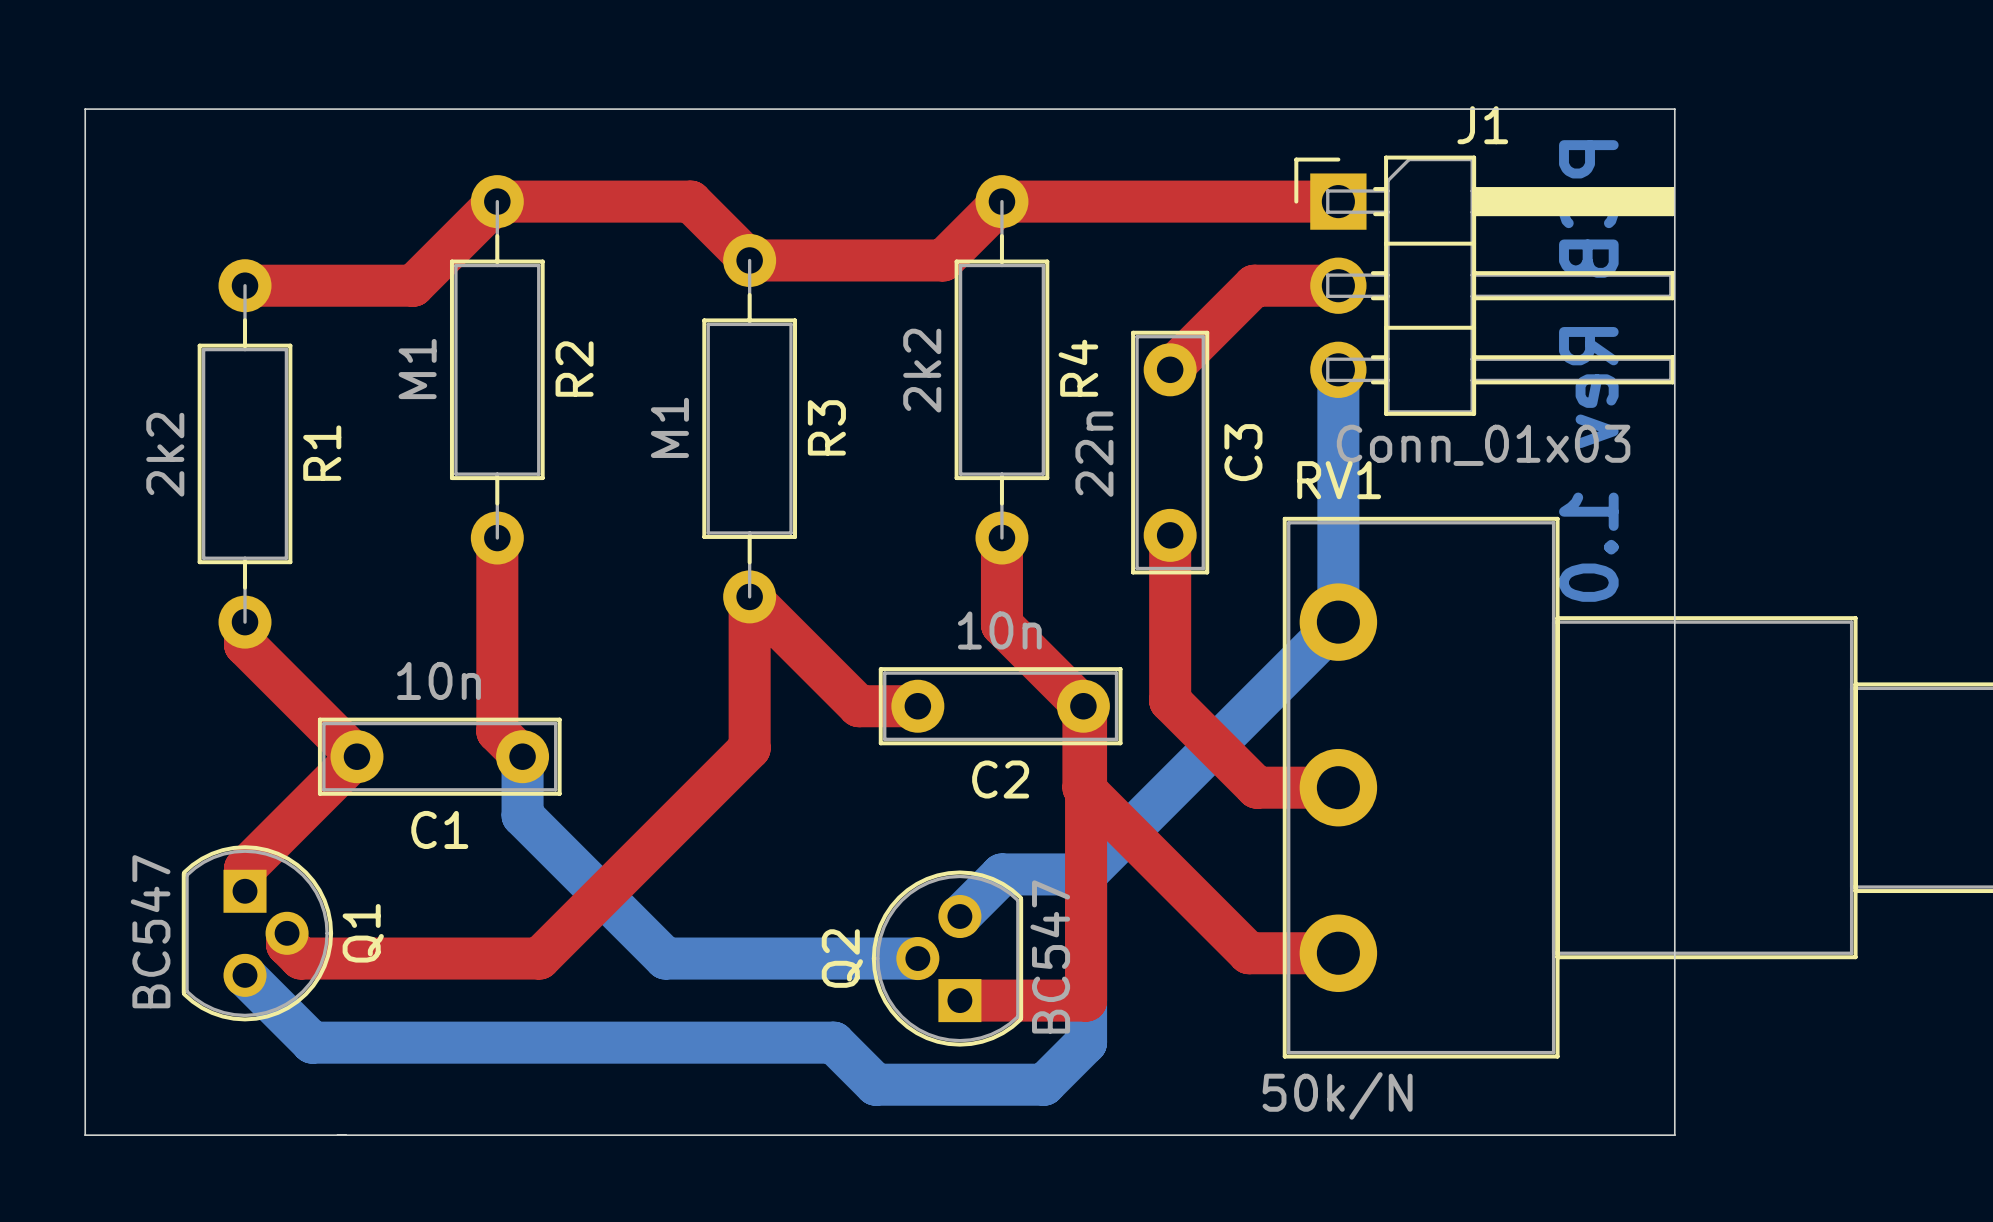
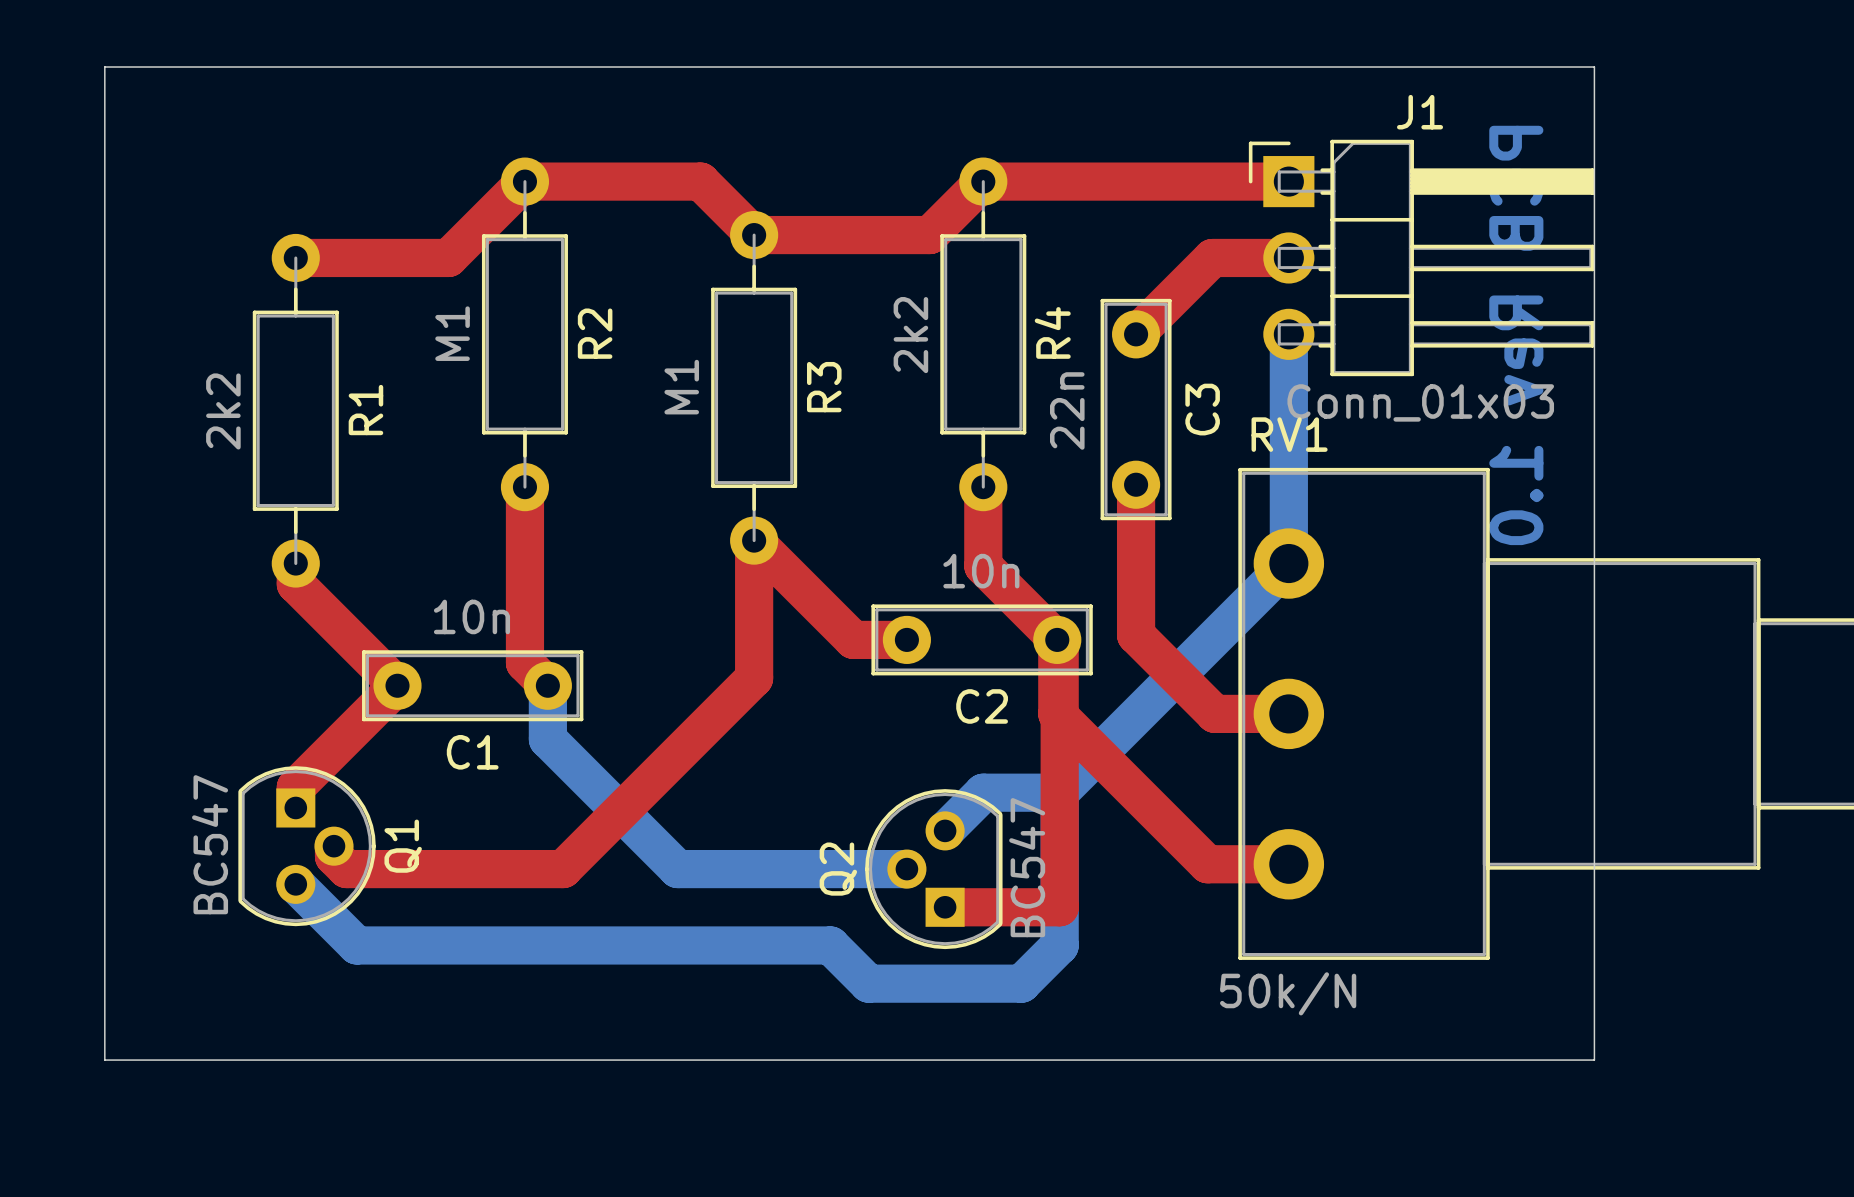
board edge: (1674, 109) (85, 109) (85, 1135) (1674, 1135) -> (1594, 97) (1594, 67) (104, 67) (104, 1060) (1594, 1060) (1594, 1029)

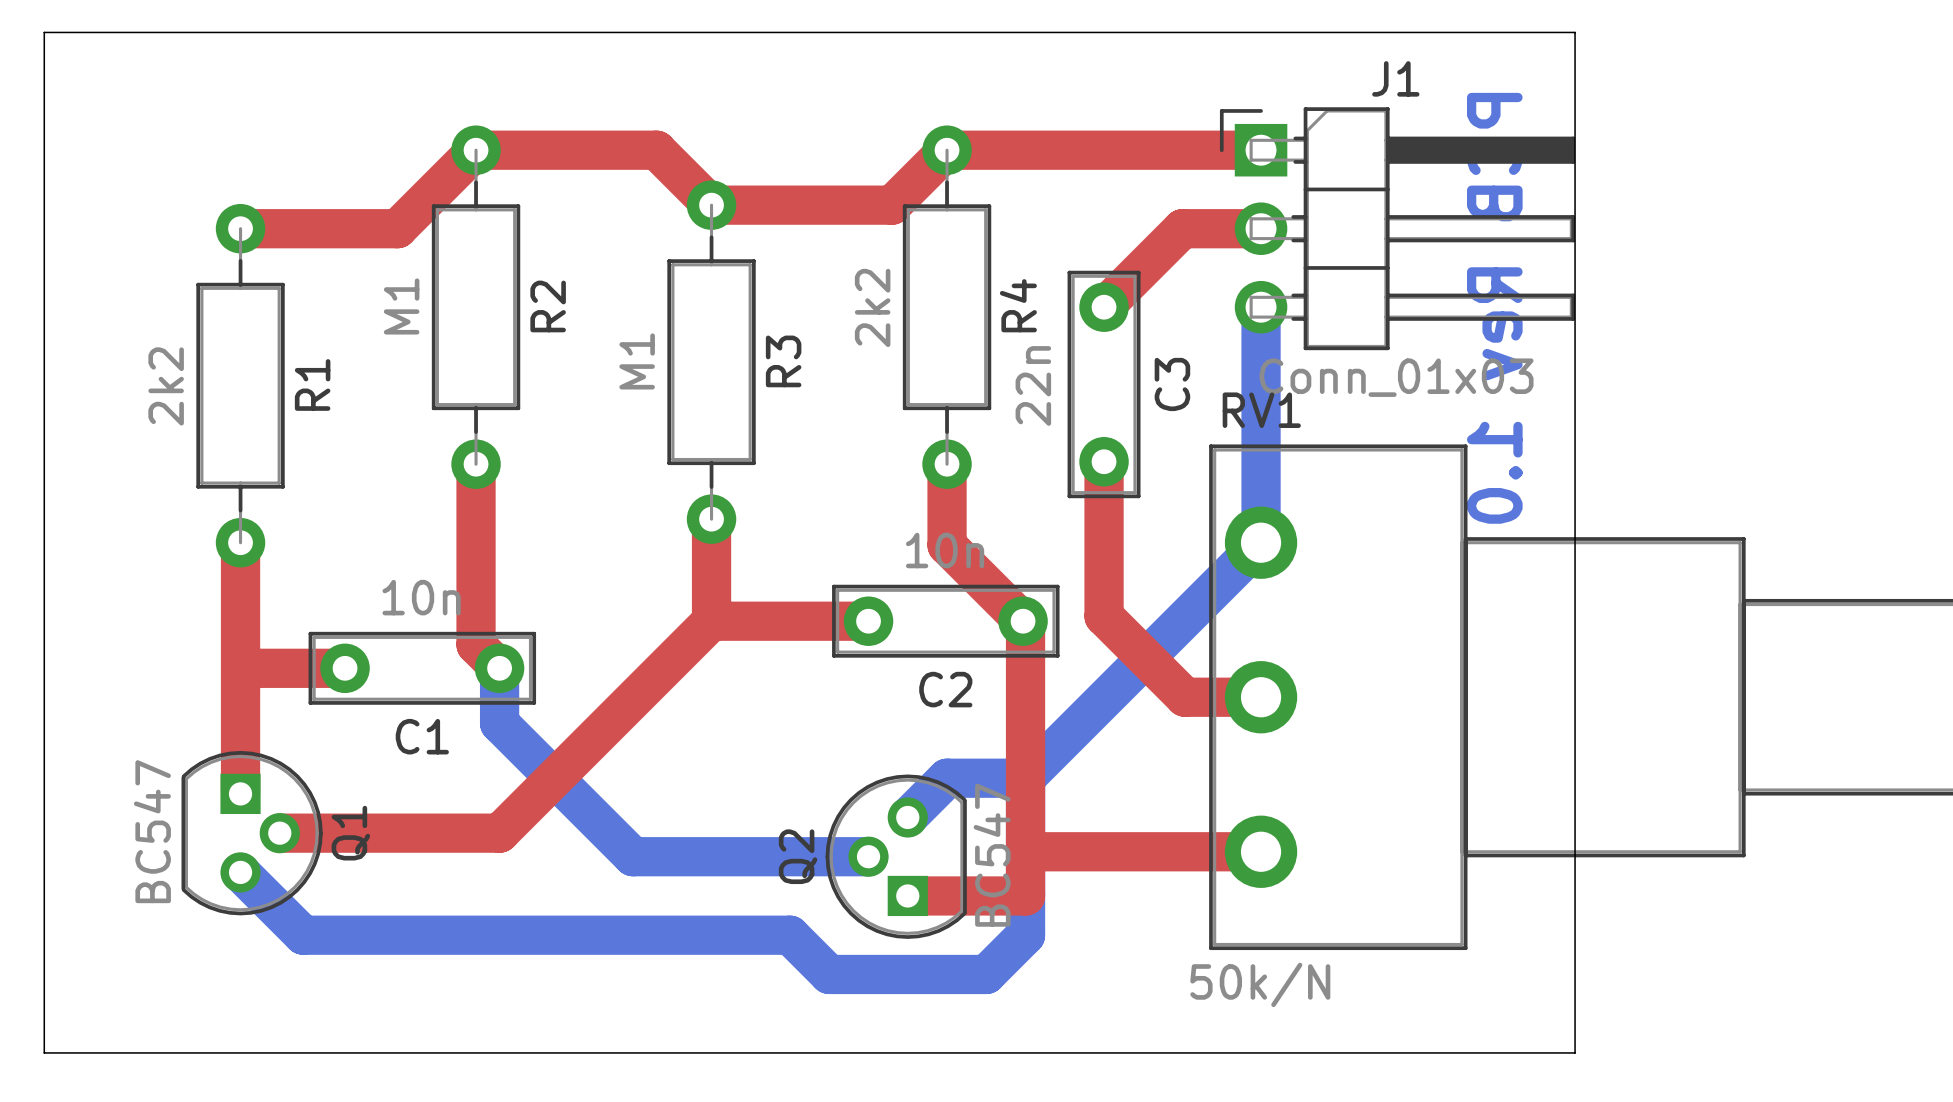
top track: (754, 540) (853, 639) -> none
top track: (295, 584) (397, 685) (295, 787) -> (240, 563) (240, 772)
top track: (754, 639) (754, 678) (563, 869) (346, 869) (333, 856) (333, 846) -> (813, 621) (711, 621) (499, 833) (279, 833)
top track: (1057, 639) (1057, 713) (1207, 864) -> (1025, 856) (1030, 851) (1177, 851)
top track: none -> (345, 668) (252, 668) (240, 680)

